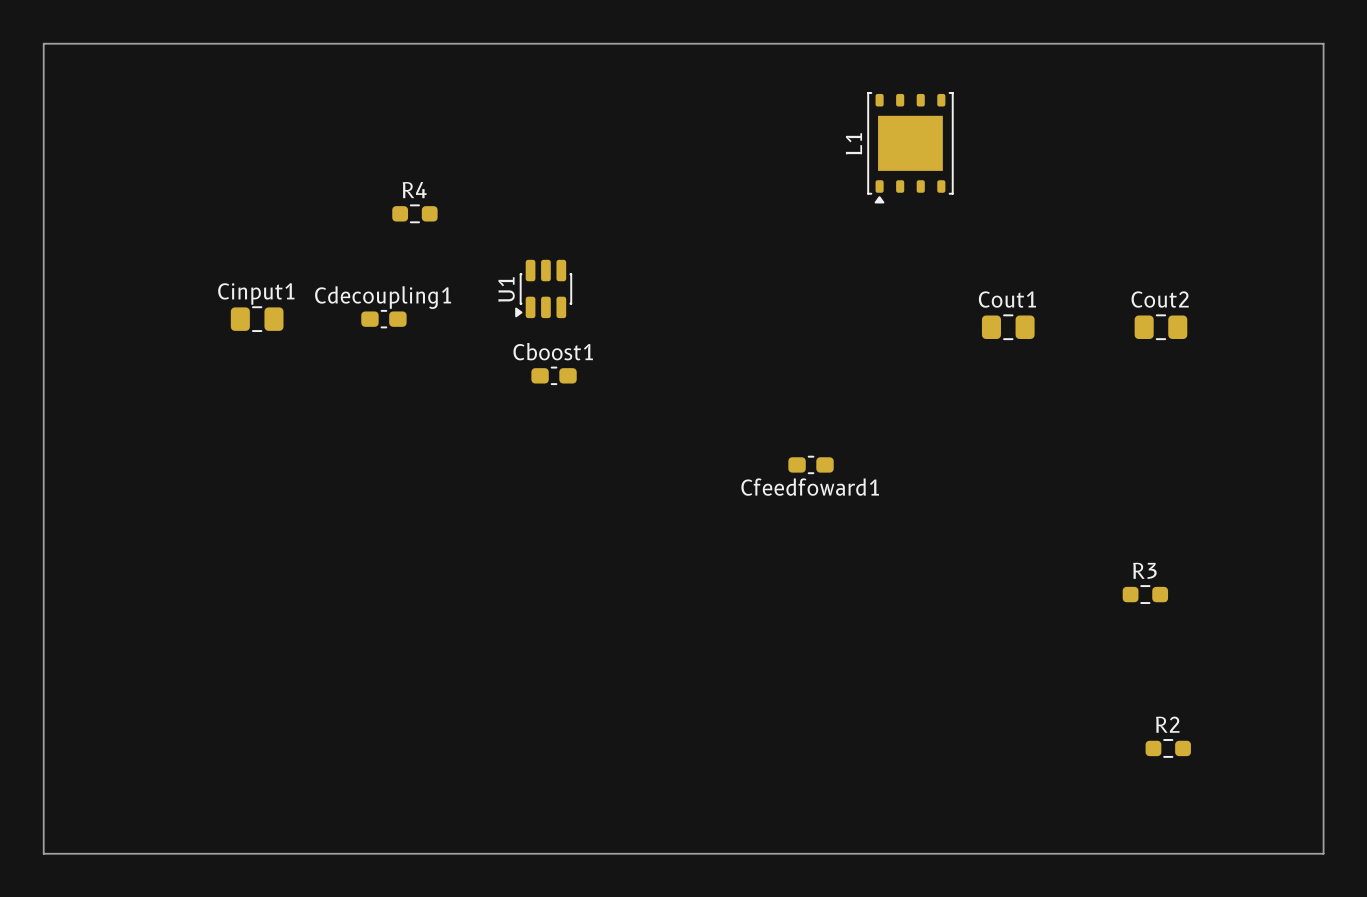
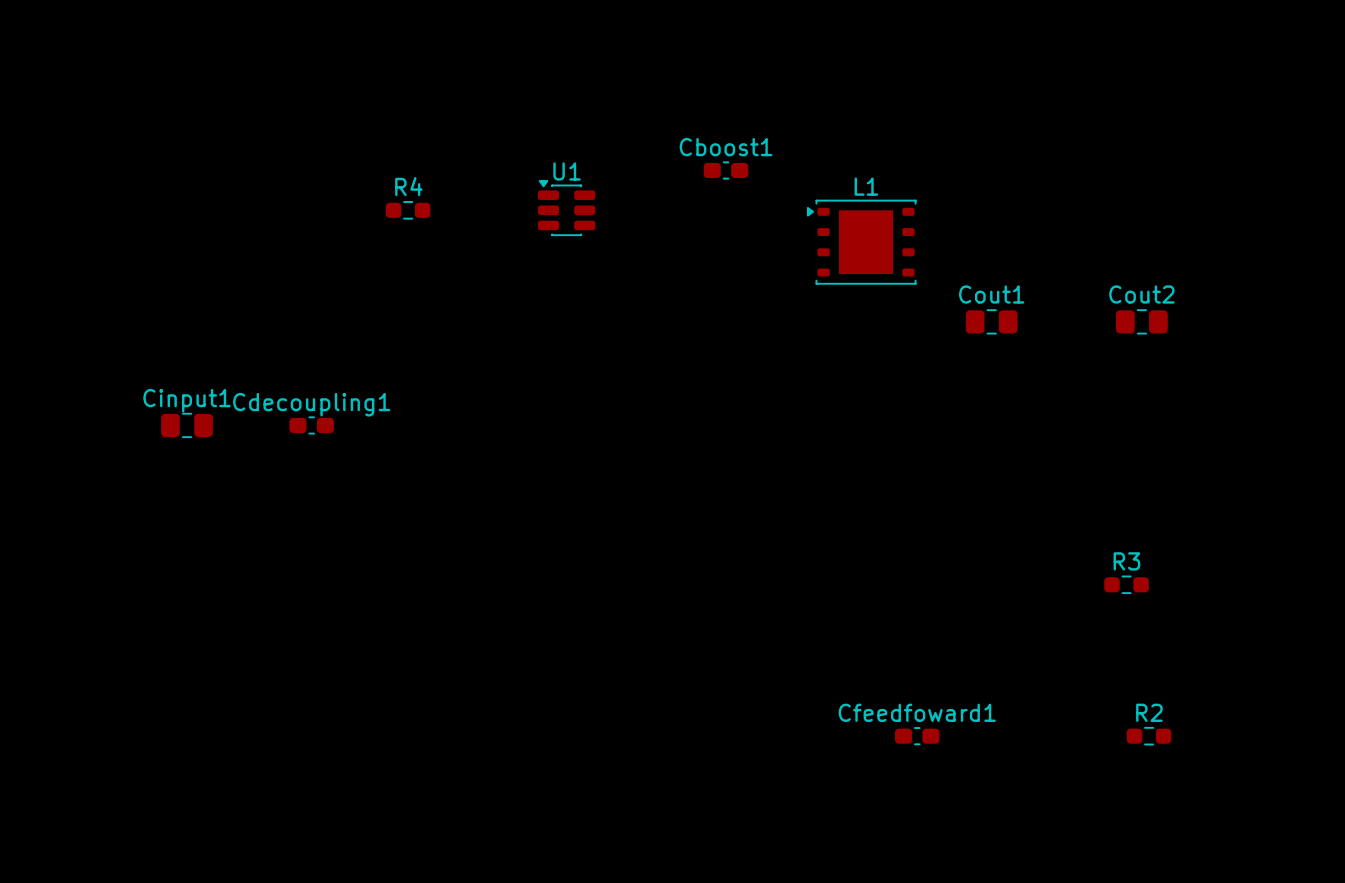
board edge: (43, 43) (1323, 43) (1323, 853) (43, 853) (43, 43) -> none
L1 rotation: 0° (910, 147) -> 90° clockwise (861, 242)
L1 position: (910, 147) -> (861, 242)
U1 rotation: 0° (543, 288) -> 90° clockwise (566, 208)
U1 position: (543, 288) -> (566, 208)
Cinput1 position: (257, 319) -> (187, 425)
Cdecoupling1 position: (383, 319) -> (311, 425)
Cboost1 position: (554, 375) -> (726, 170)
Cfeedfoward1 position: (811, 464) -> (917, 736)
Cfeedfoward1 name position: Cfeedfoward1 (810, 487) -> Cfeedfoward1 (917, 712)

